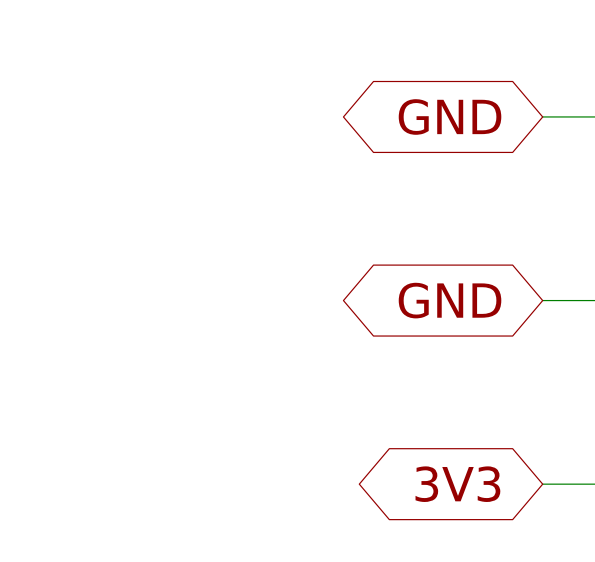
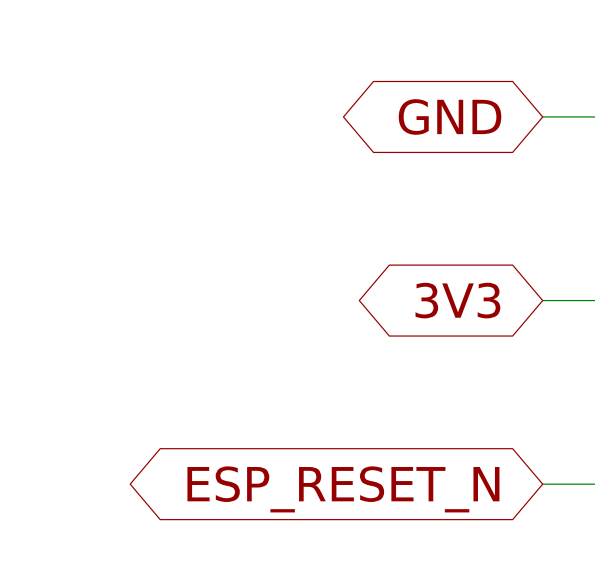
global label: GND (450, 300) -> 3V3 (457, 300)
global label: 3V3 (457, 484) -> ESP_RESET_N (343, 489)

